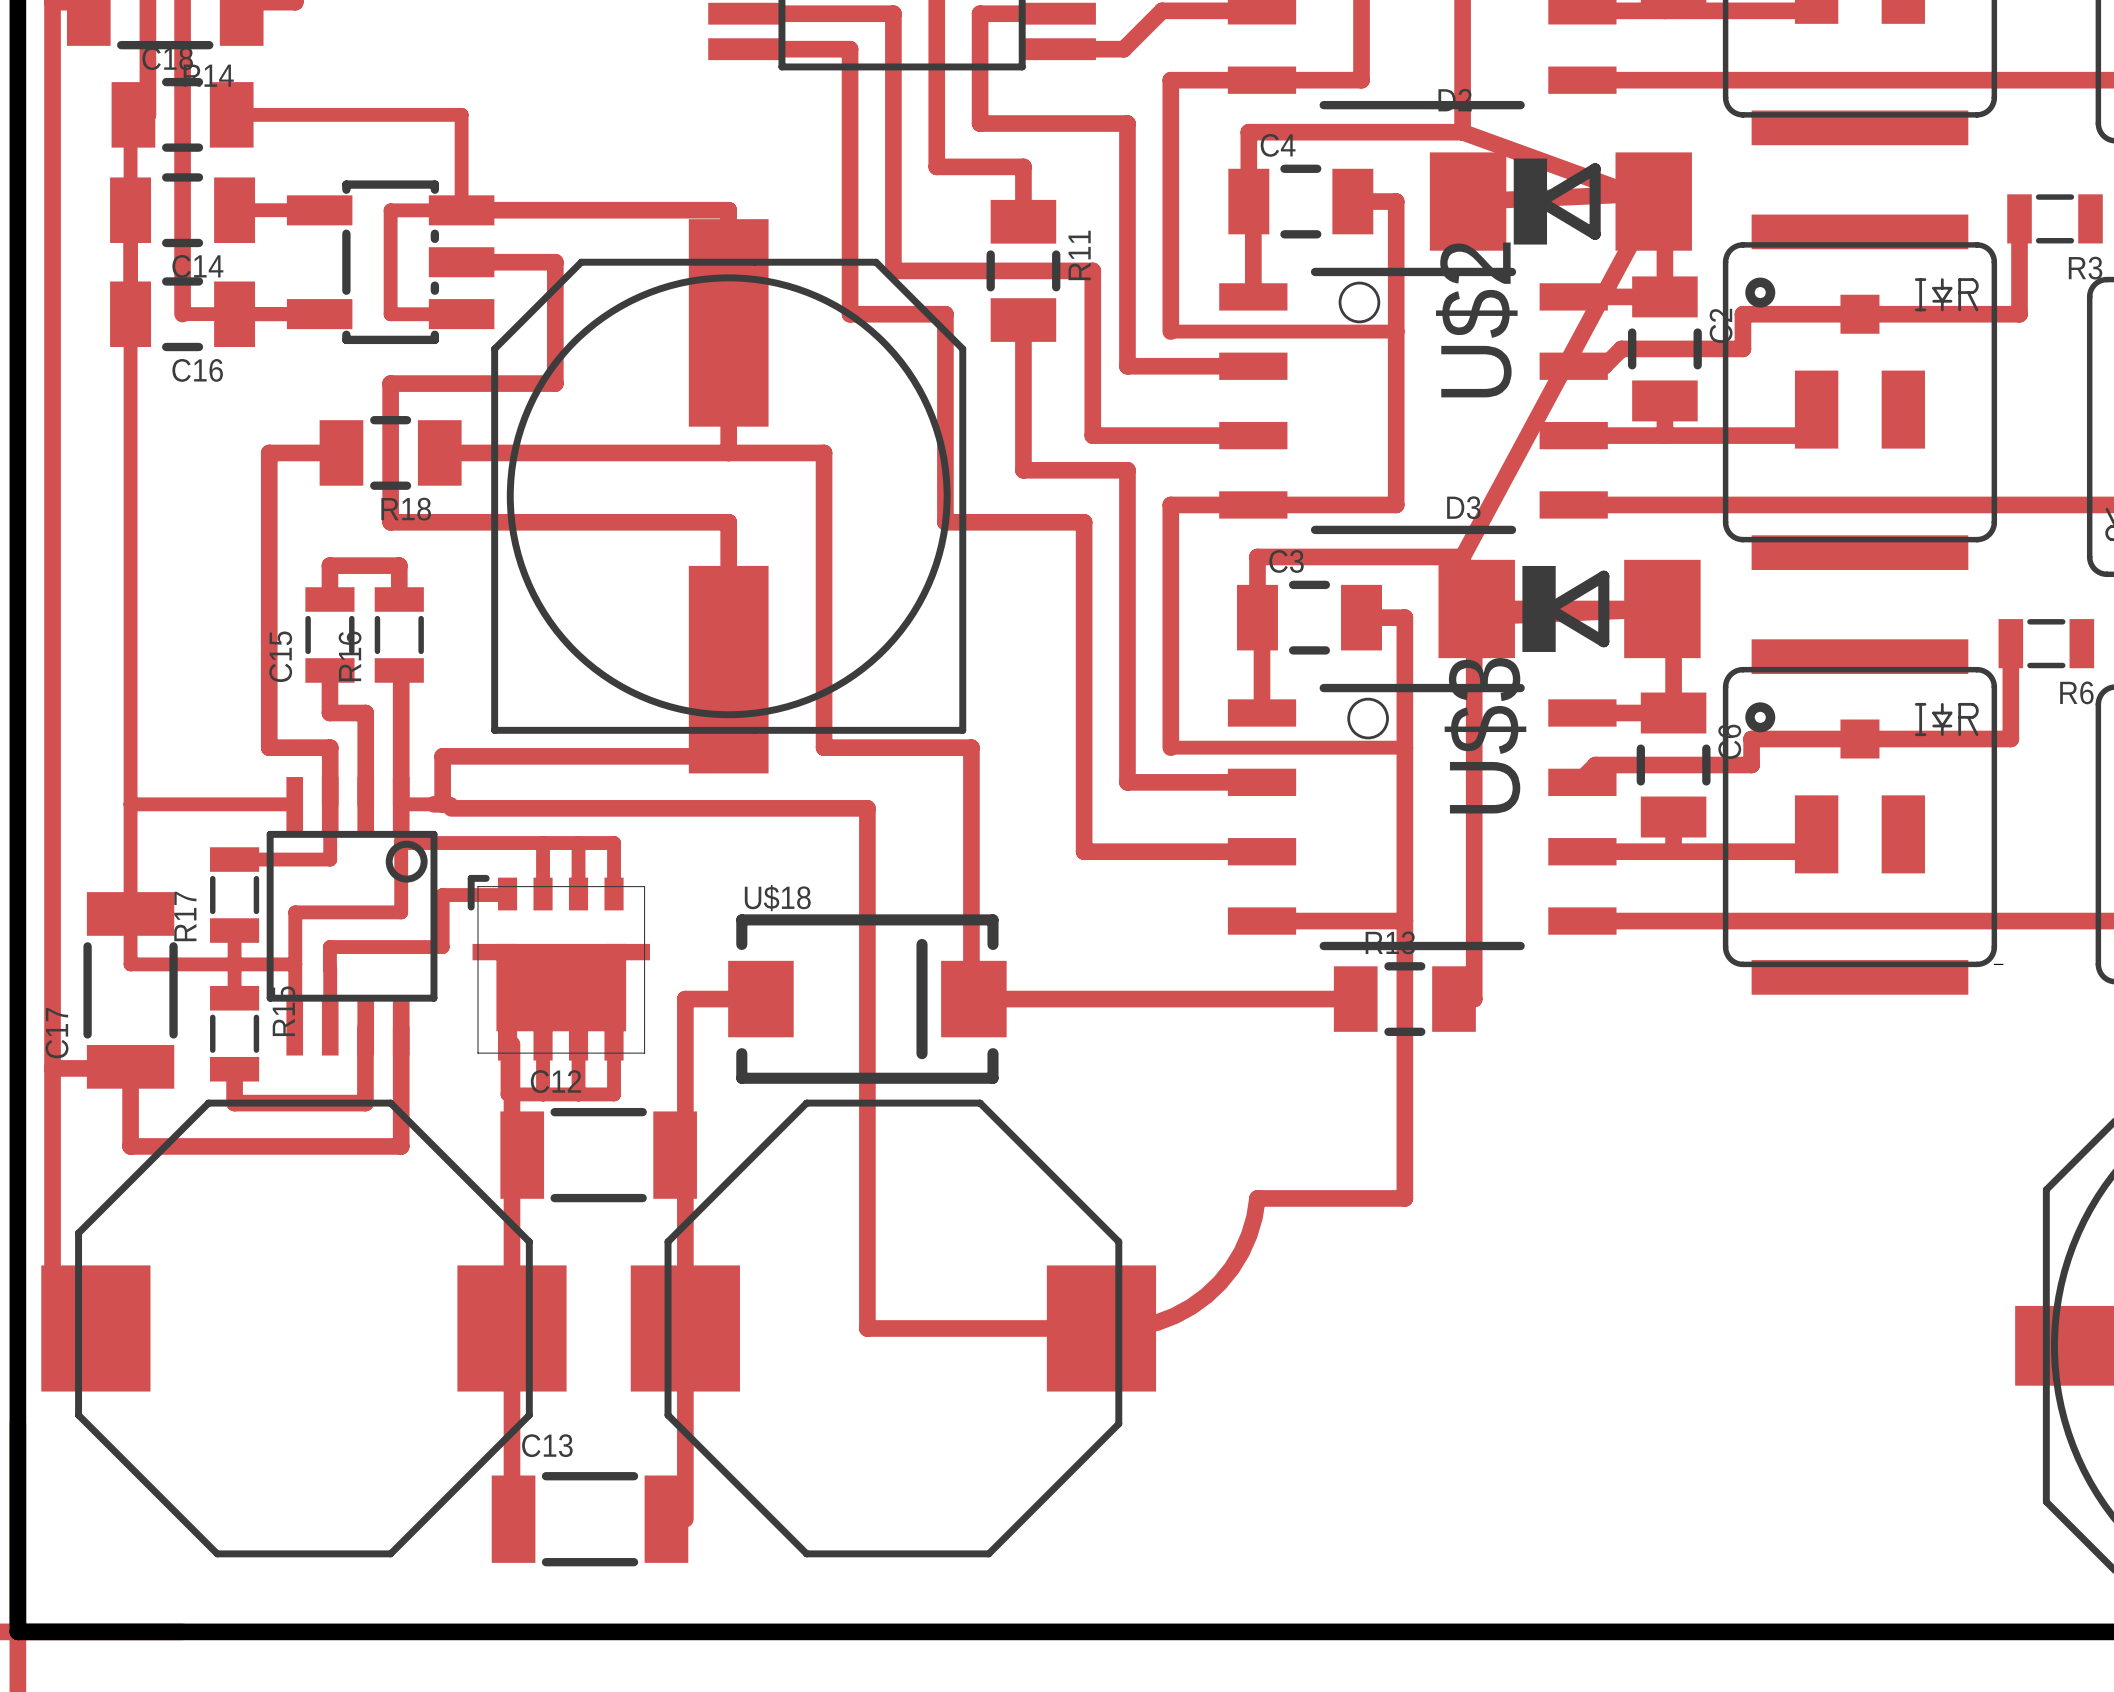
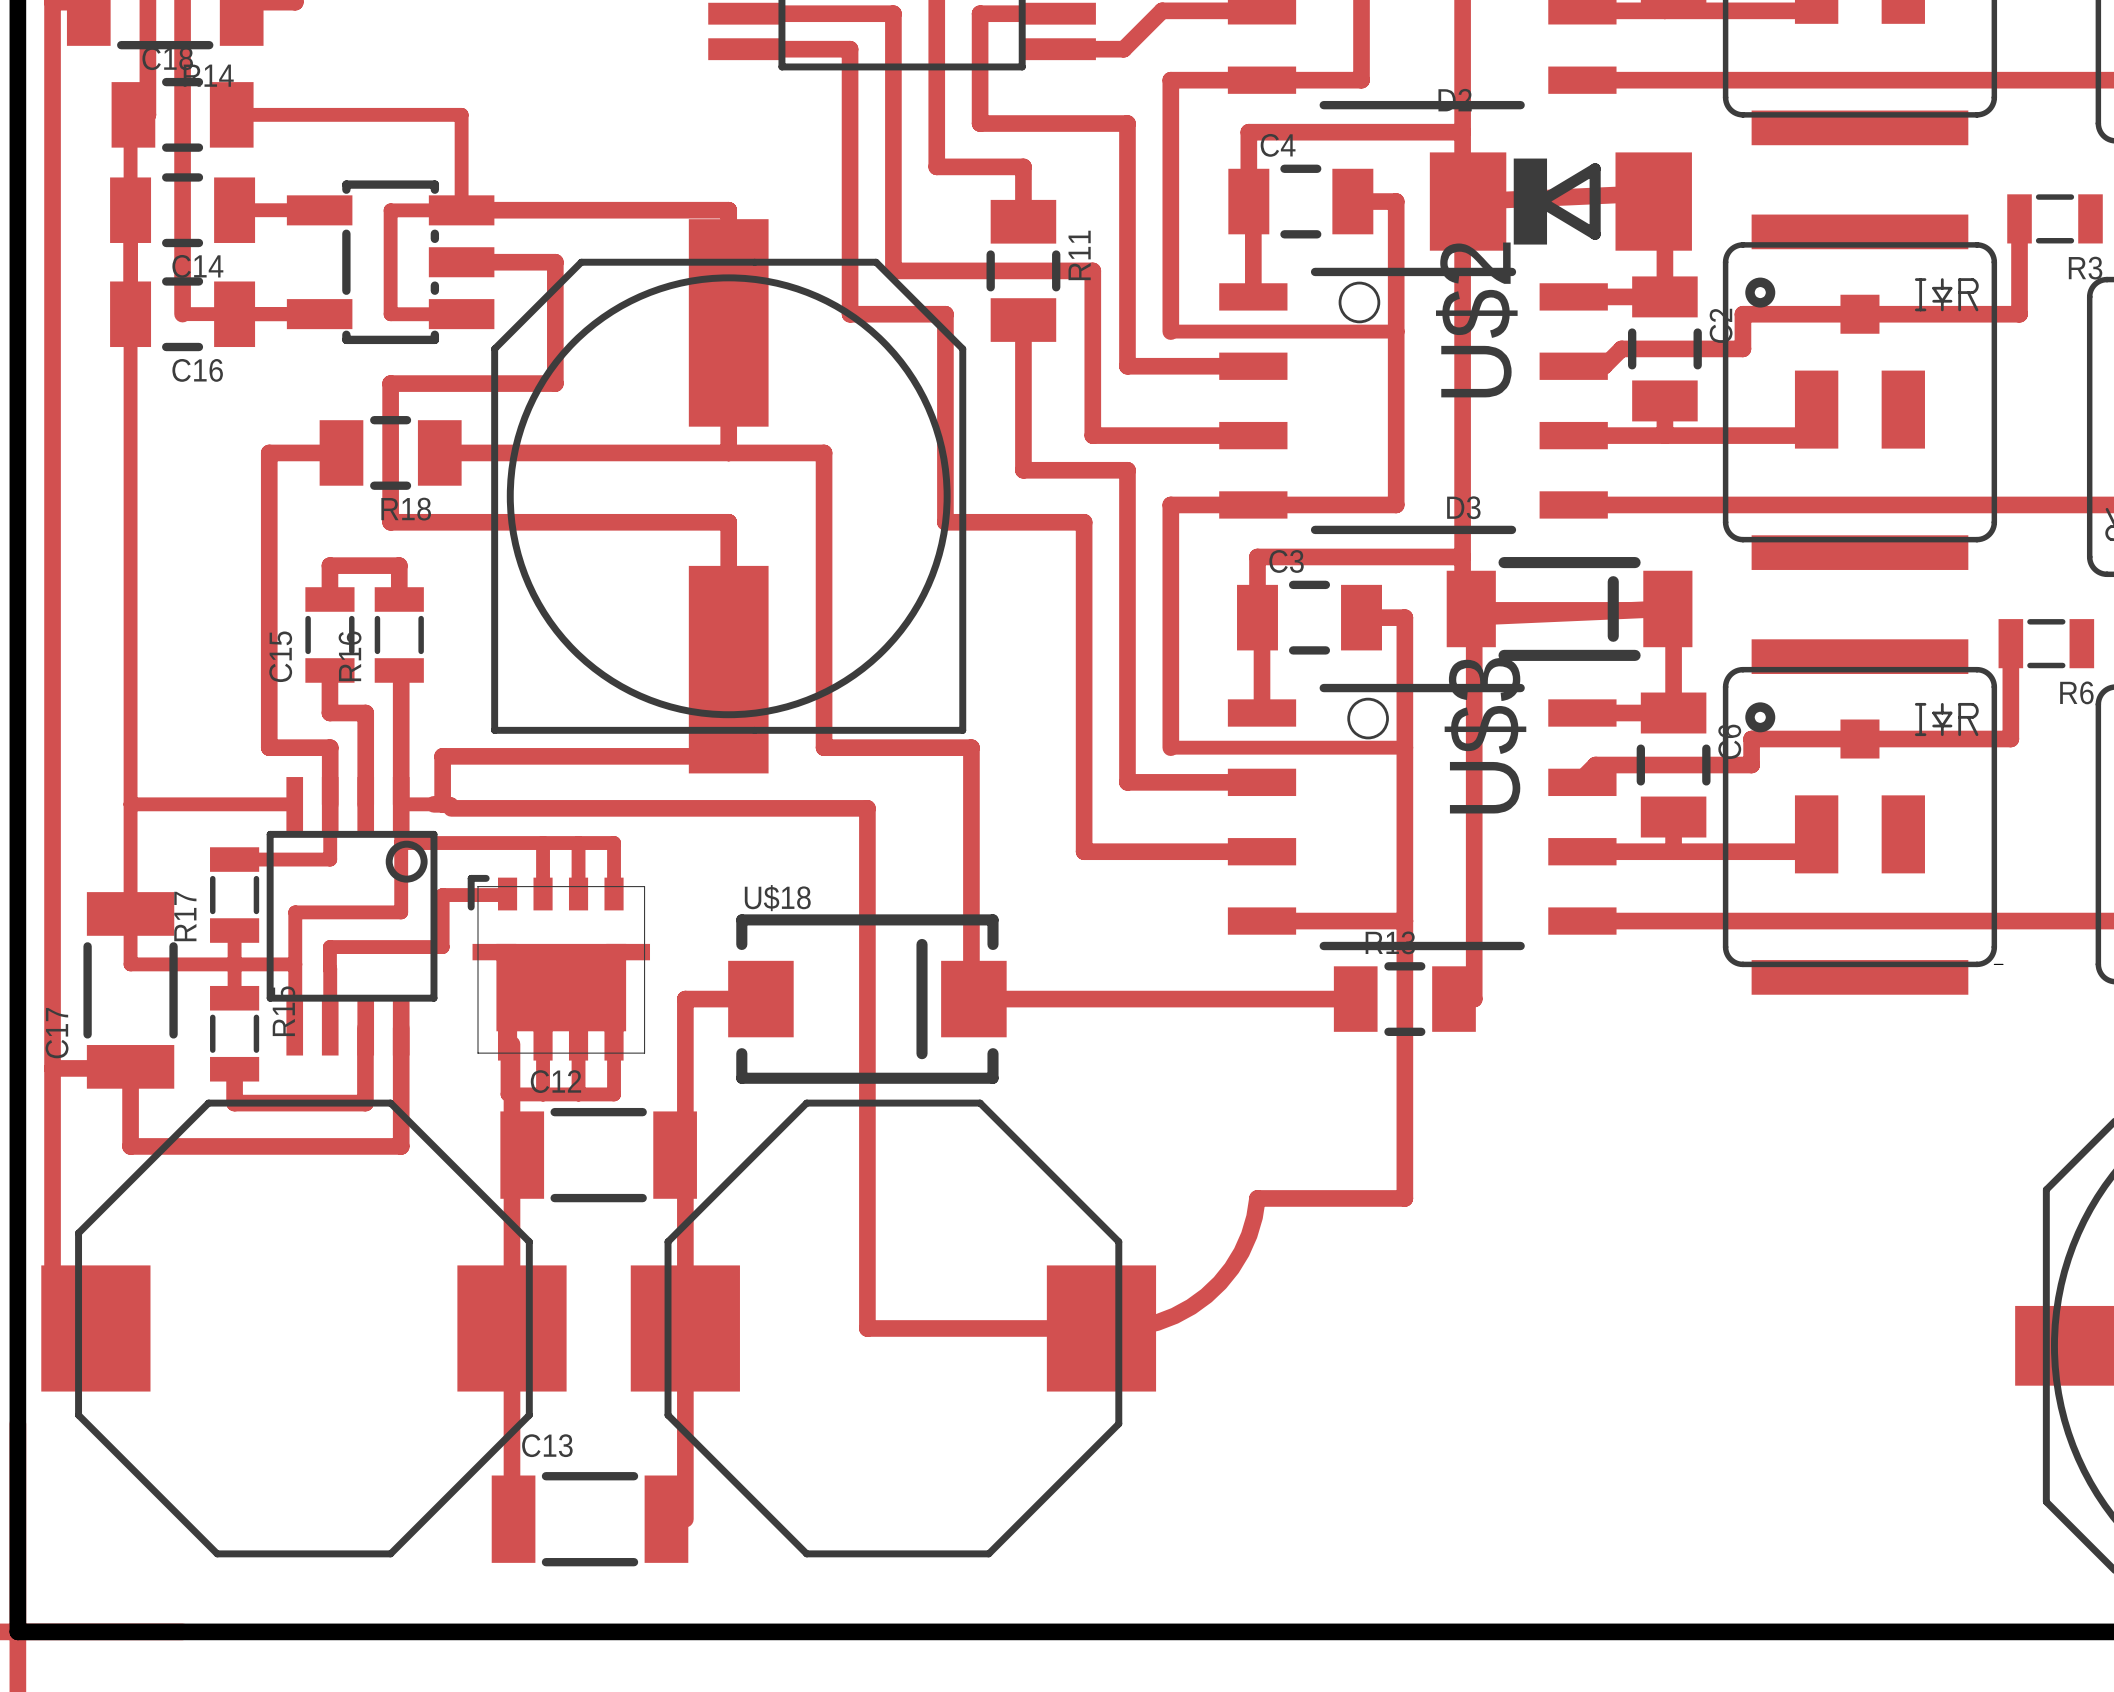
top track: (1462, 132) (1653, 201) (1462, 556) -> (1462, 132) (1462, 556)
D3 footprint: [1438, 559, 1701, 659] -> [1446, 557, 1693, 661]

